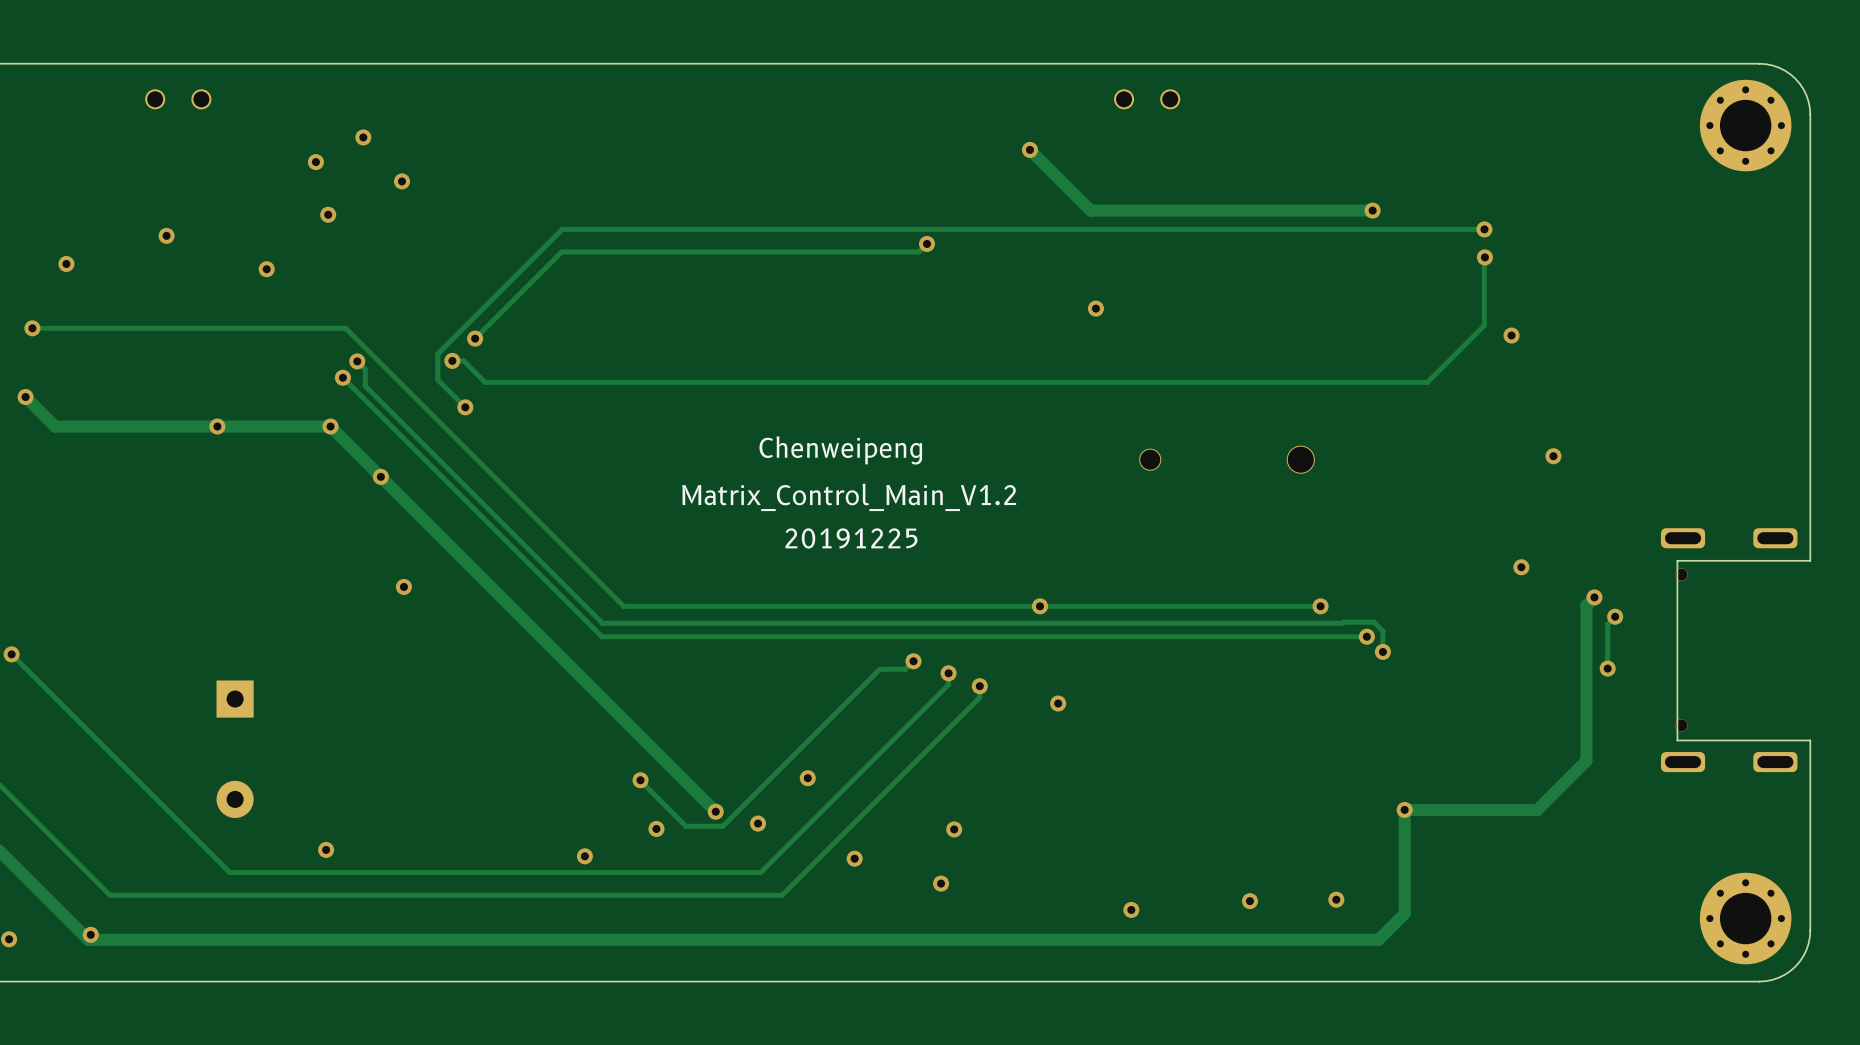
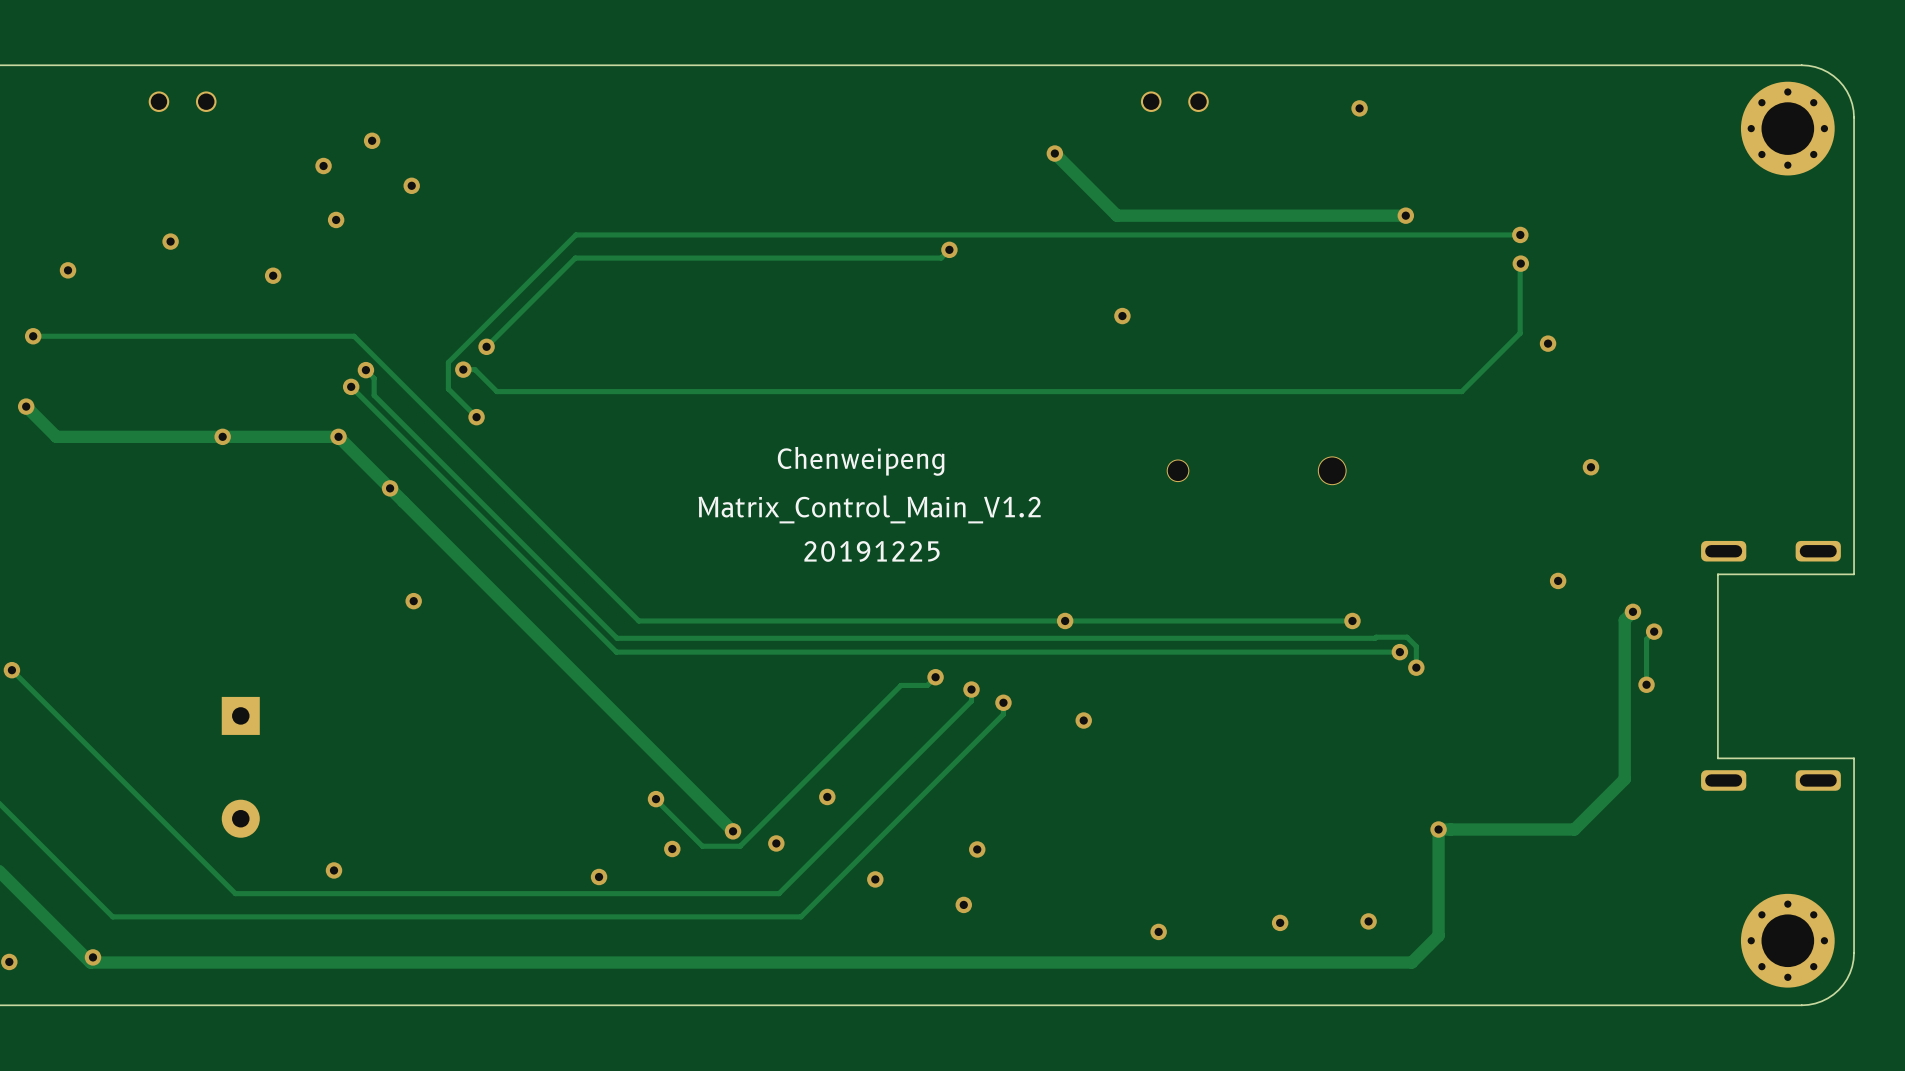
via: none -> (1359, 108)
part: (1681, 574) -> none
part: (1681, 725) -> none

